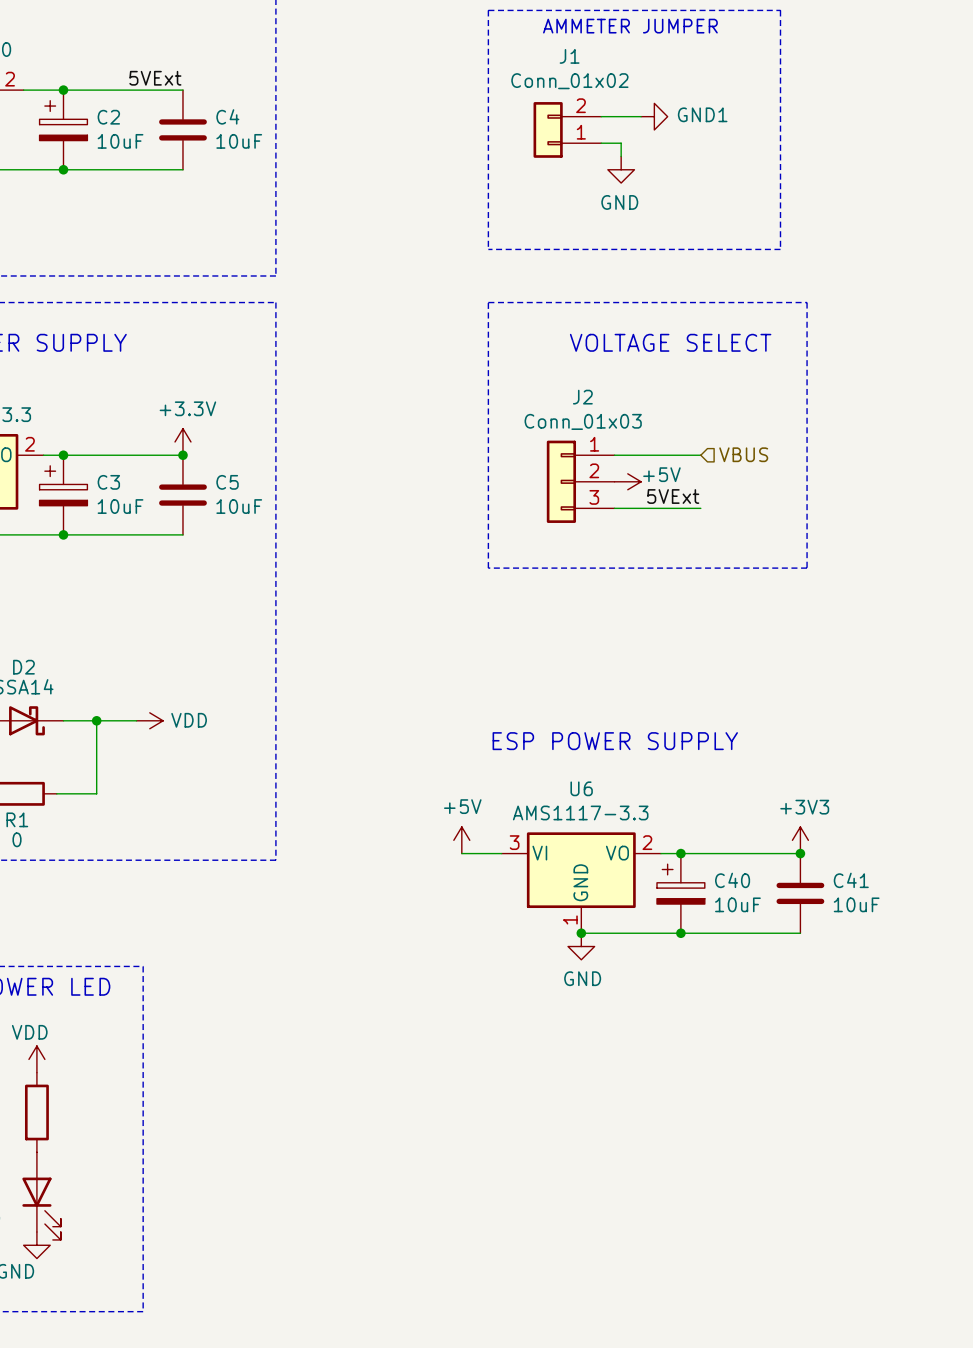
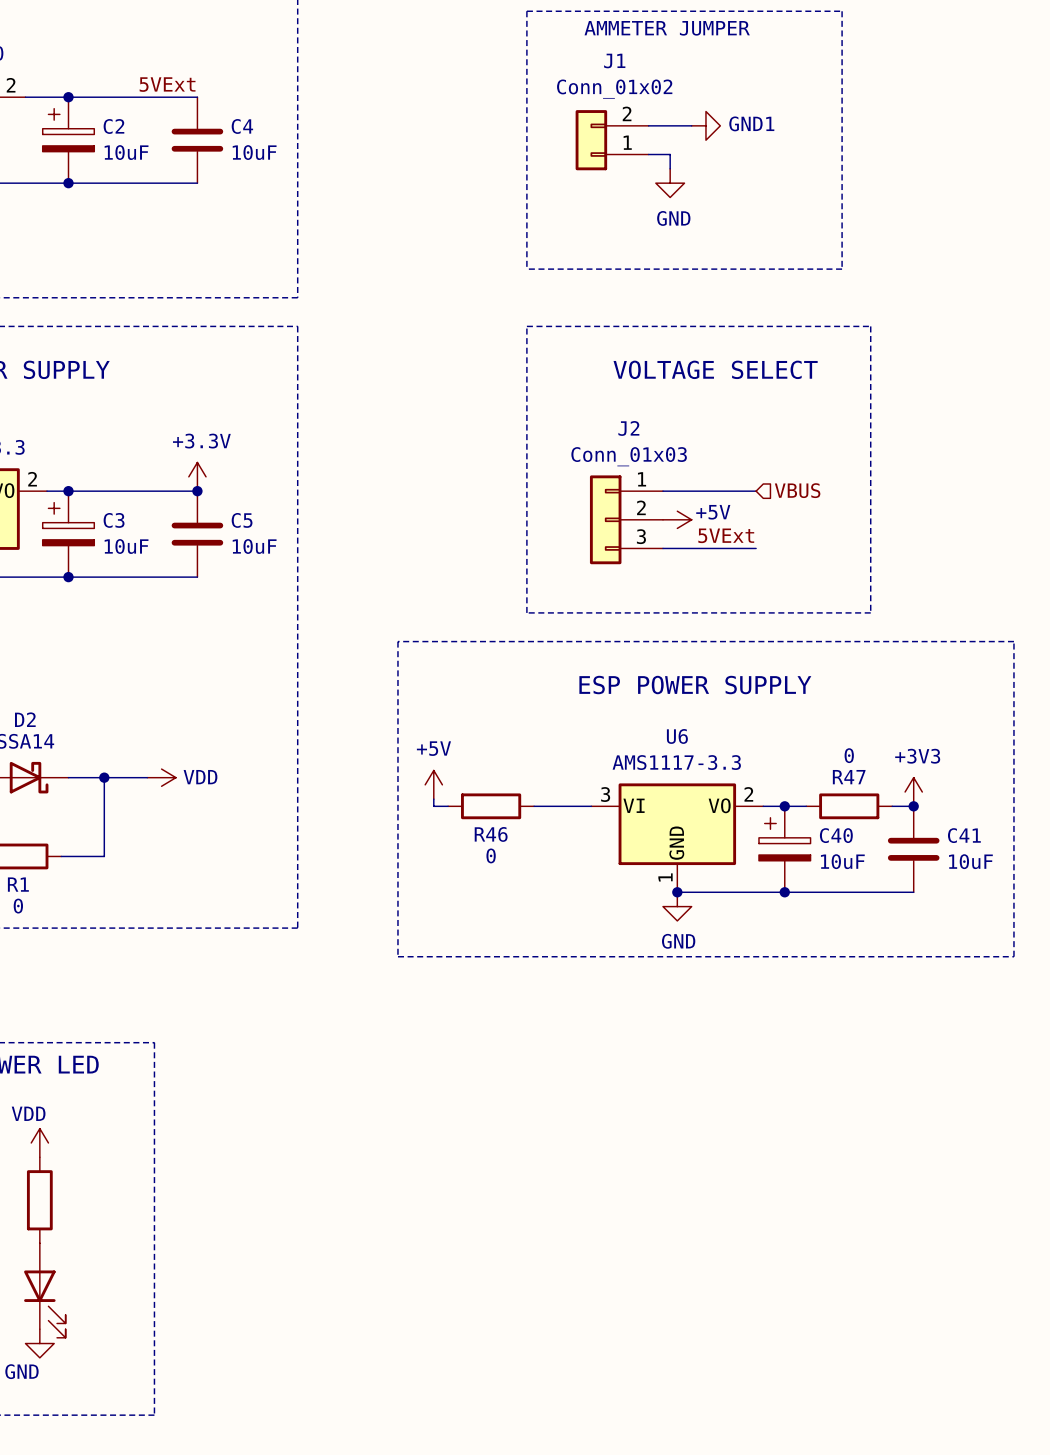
line: none -> (397, 641) (397, 956) (1013, 956) (1013, 641) (397, 641)
wire: none -> (433, 799) (433, 806) (448, 806)
text position: ESP POWER SUPPLY (615, 741) -> ESP POWER SUPPLY (695, 685)
R46: none -> 0 (491, 806)
wire: none -> (534, 806) (591, 806)
wire: none -> (763, 806) (806, 806)
junction: none -> (784, 806)
R47: none -> 0 (849, 806)
wire: none -> (892, 806) (913, 806)
junction: none -> (913, 806)
junction: none -> (677, 892)
junction: none -> (784, 892)
power symbol position: +5V (461, 840) -> +5V (433, 784)
power symbol position: +3V3 (800, 840) -> +3V3 (913, 792)
wire: (461, 853) (501, 853) -> none
wire: (660, 853) (800, 853) -> none
junction: (680, 853) -> none
junction: (800, 853) -> none
U6 position: (581, 882) -> (677, 837)
C40 position: (680, 893) -> (784, 849)
C41 position: (800, 893) -> (913, 849)
wire: (581, 933) (800, 933) -> (677, 892) (913, 892)
junction: (581, 933) -> none
junction: (680, 933) -> none
power symbol position: GND (581, 946) -> GND (677, 906)

